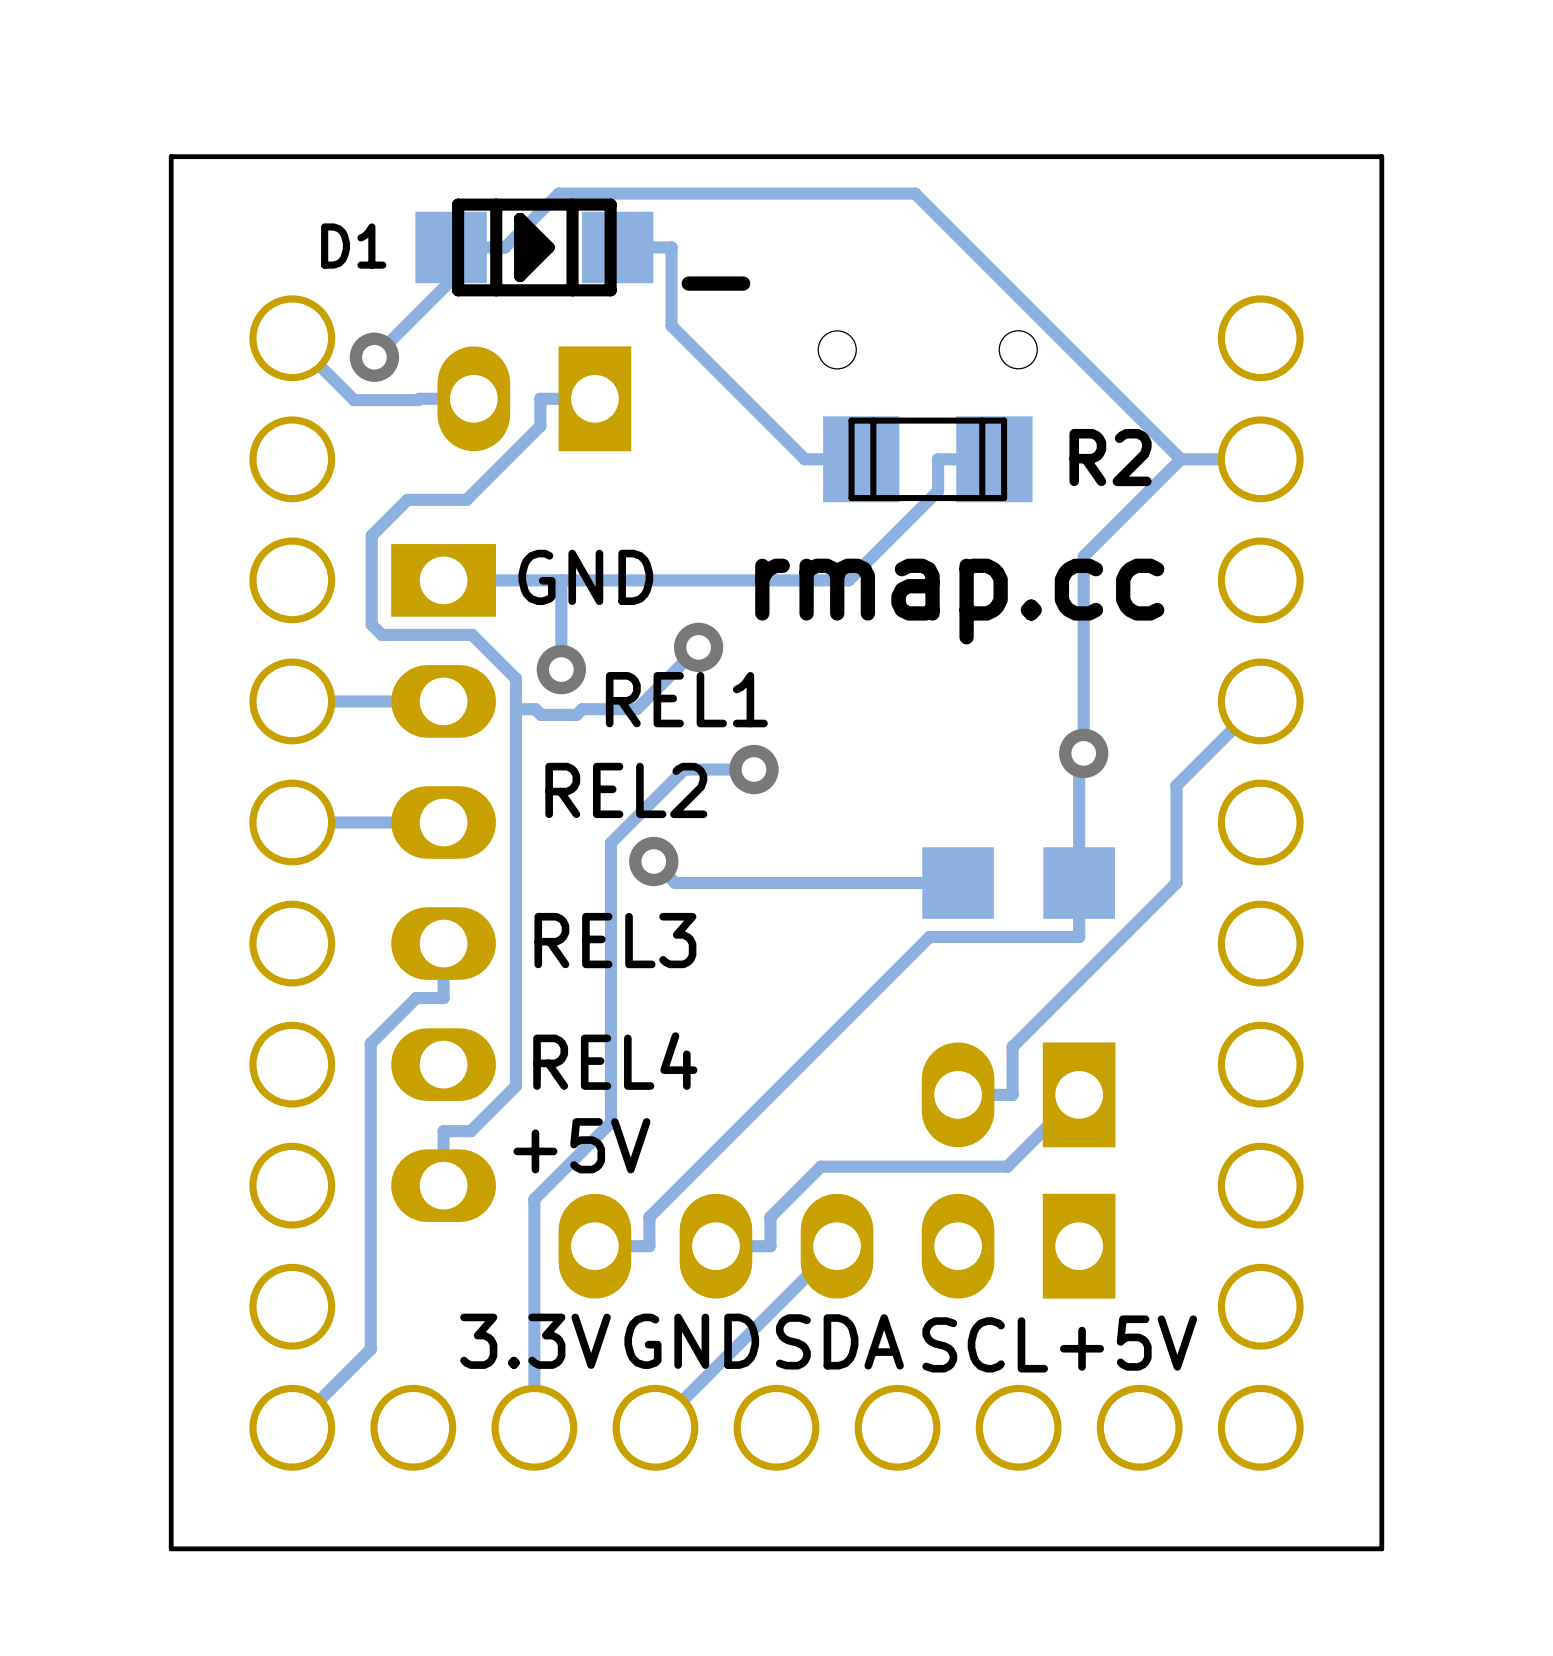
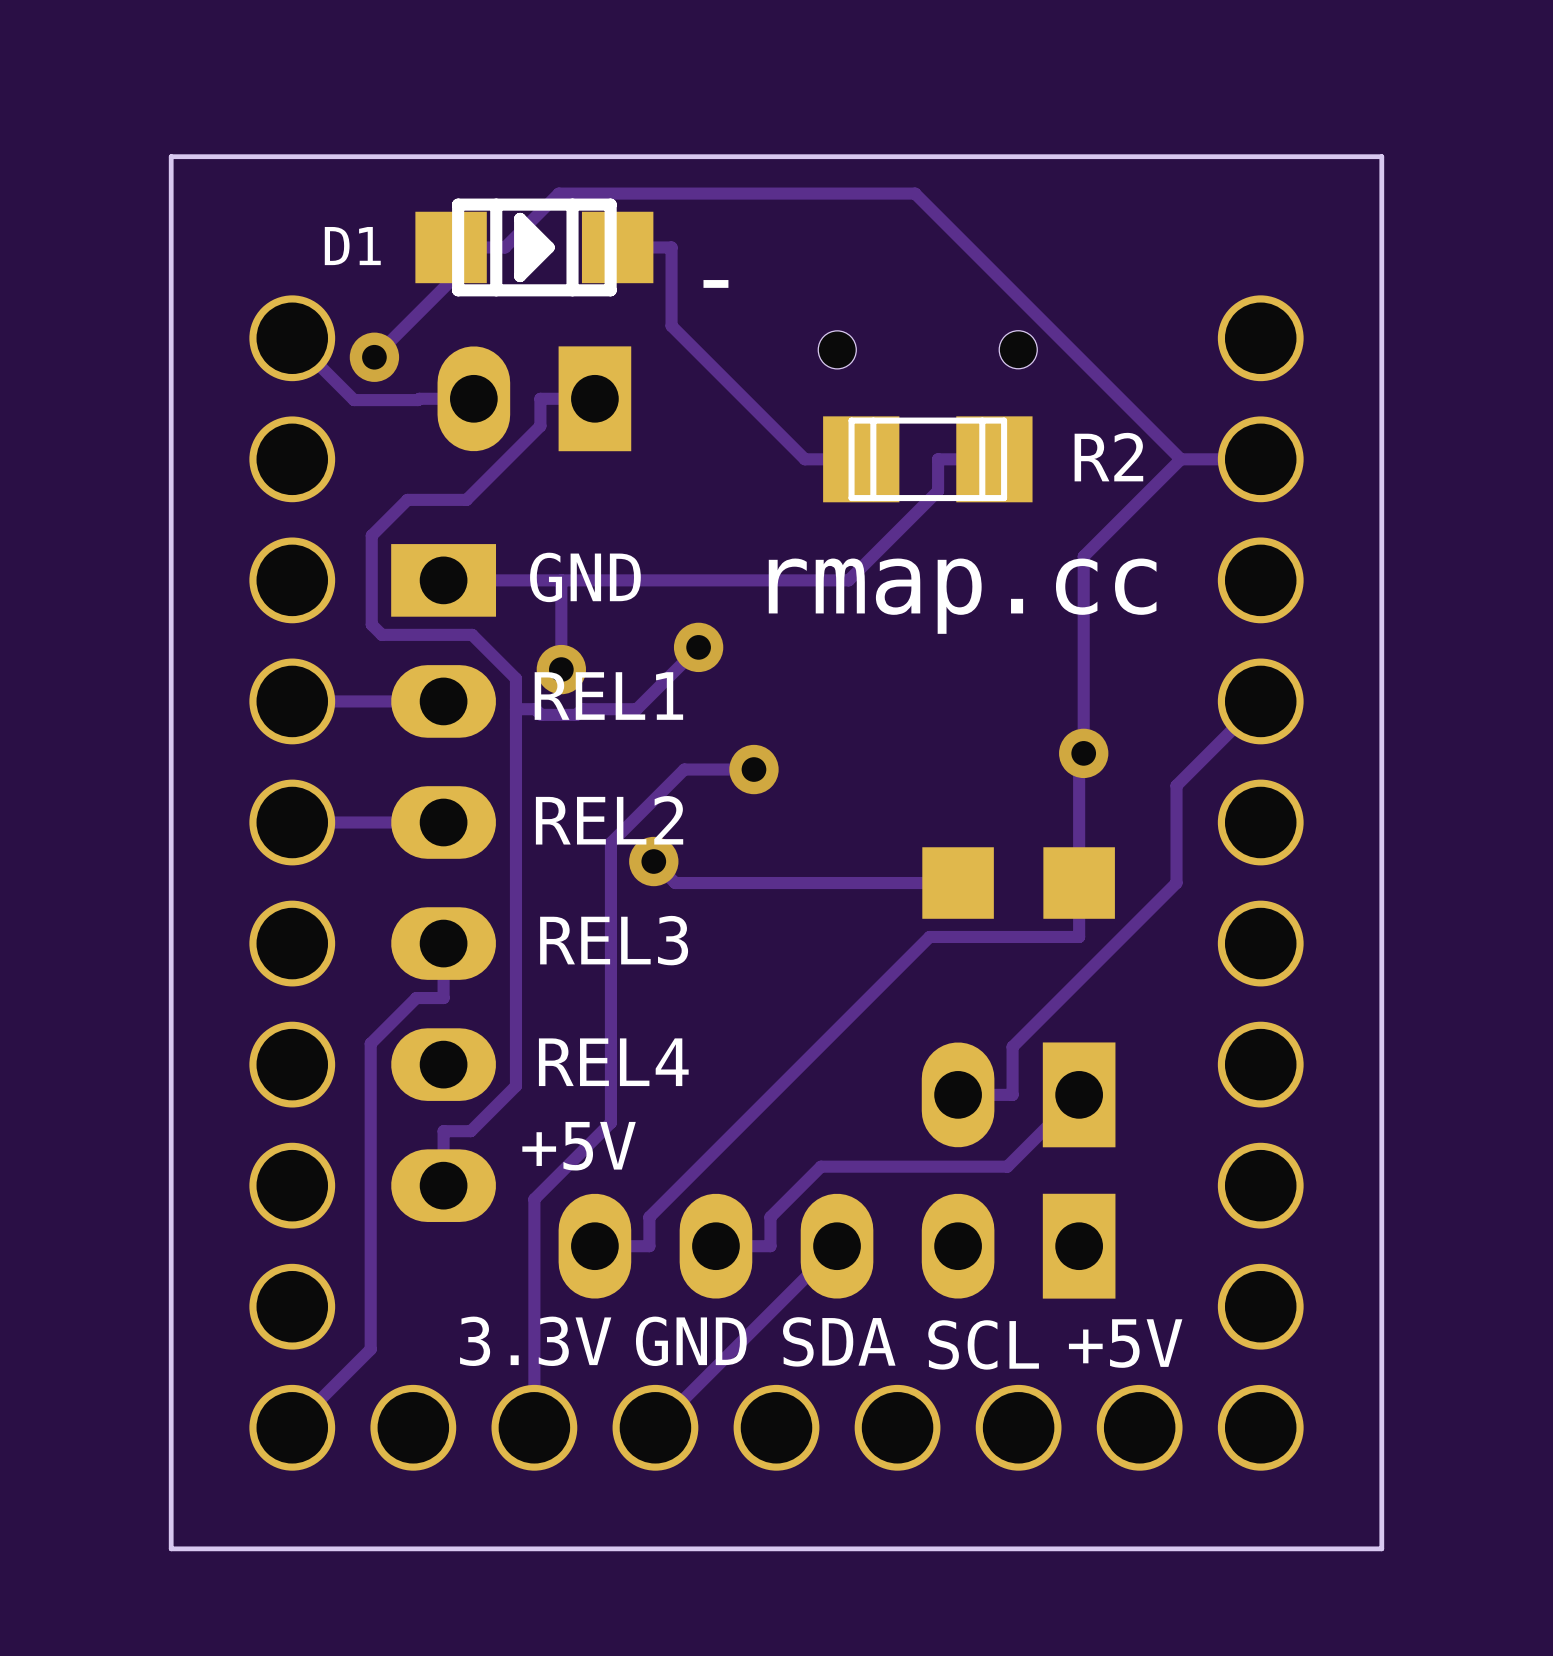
text position: REL1 (686, 699) -> REL1 (608, 696)
text position: REL2 (626, 790) -> REL2 (609, 820)

